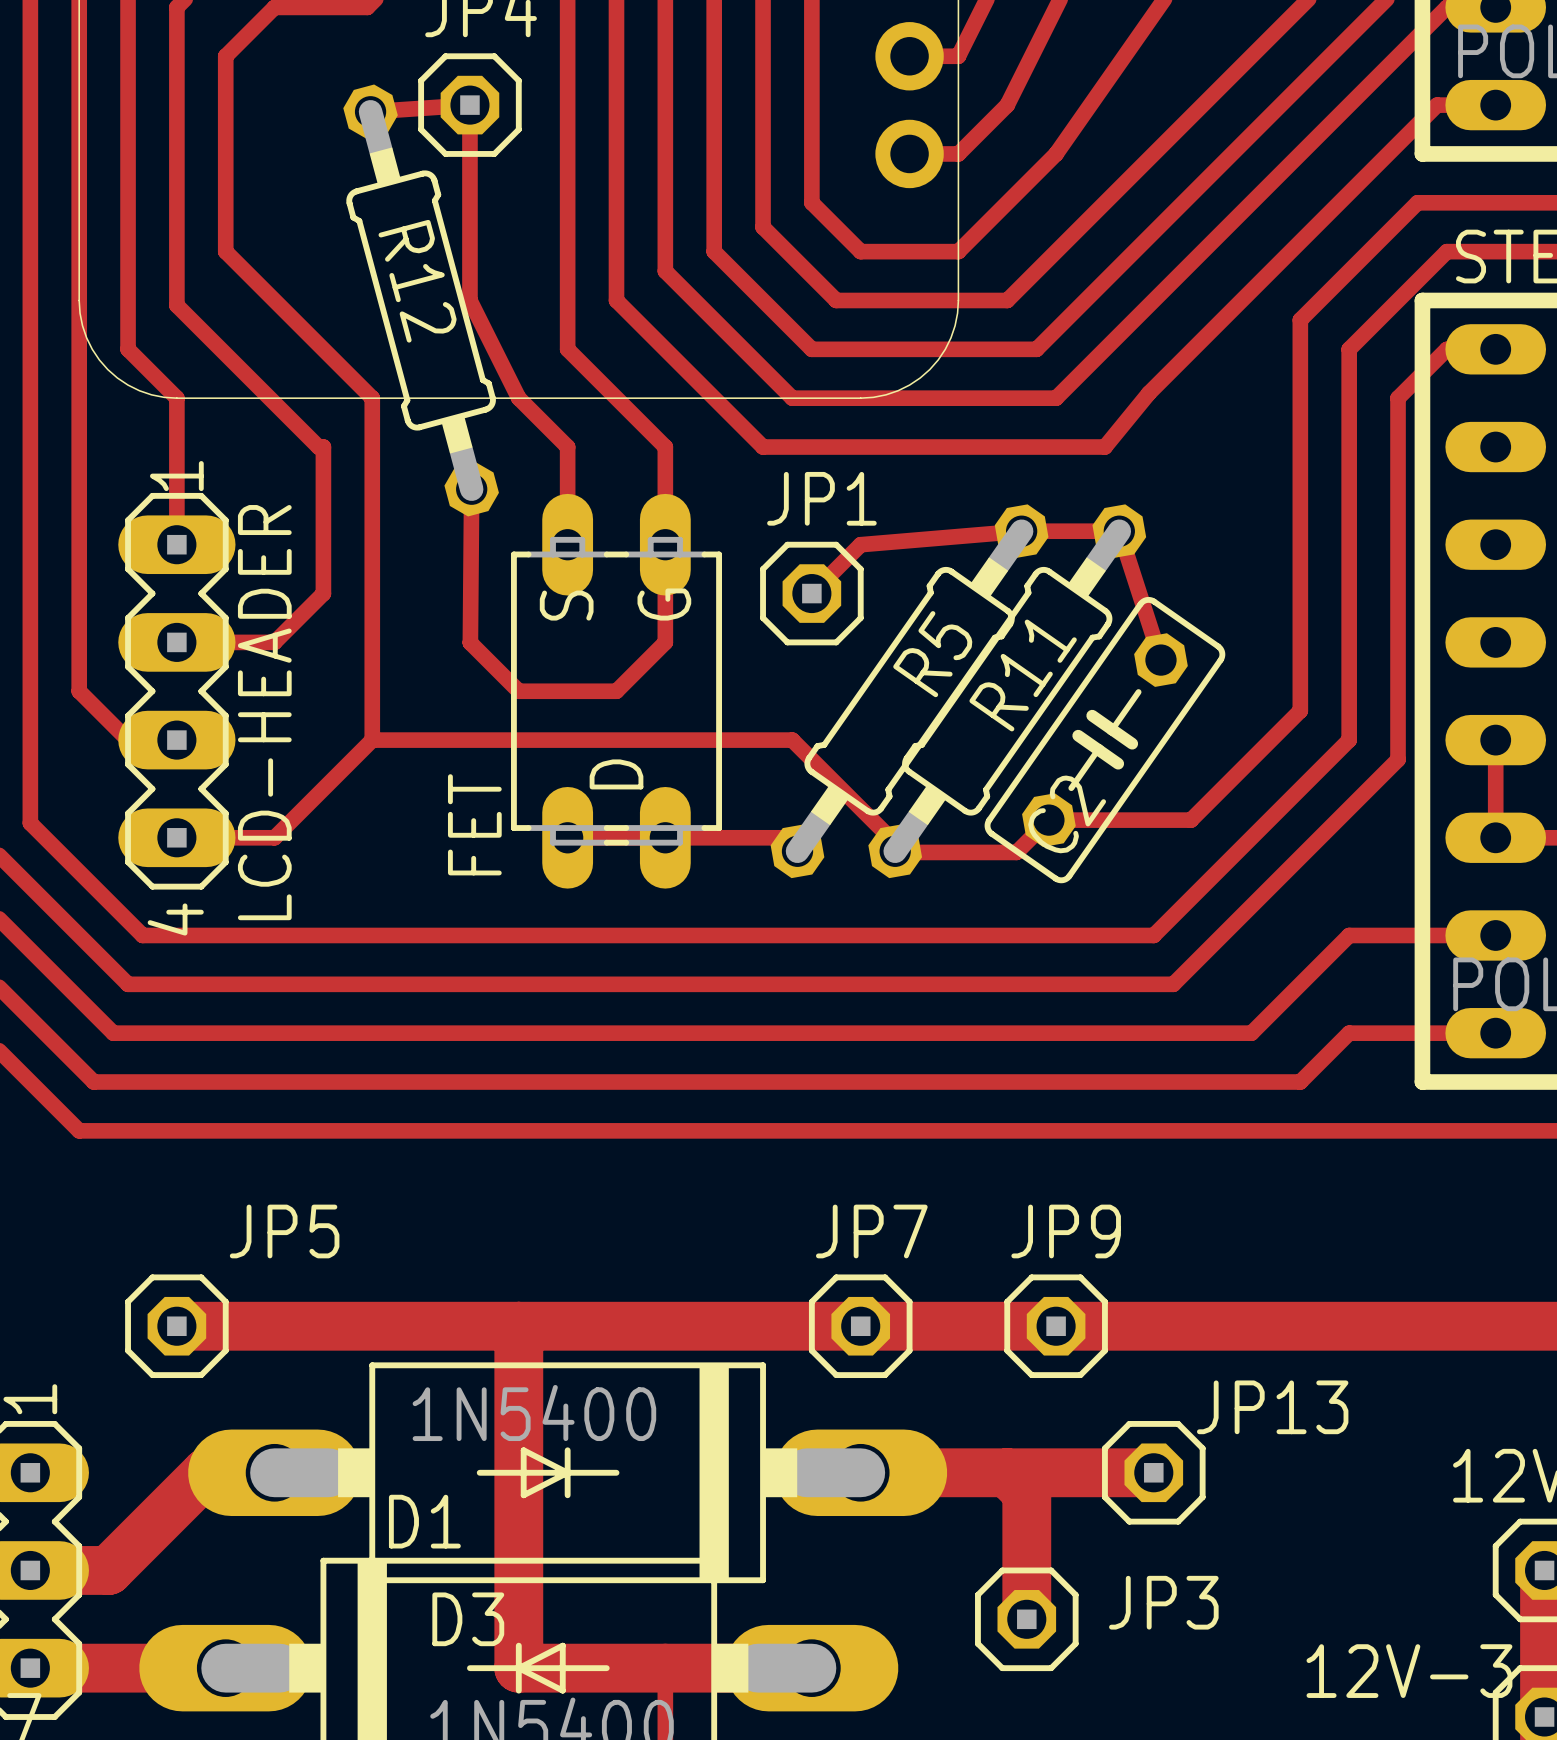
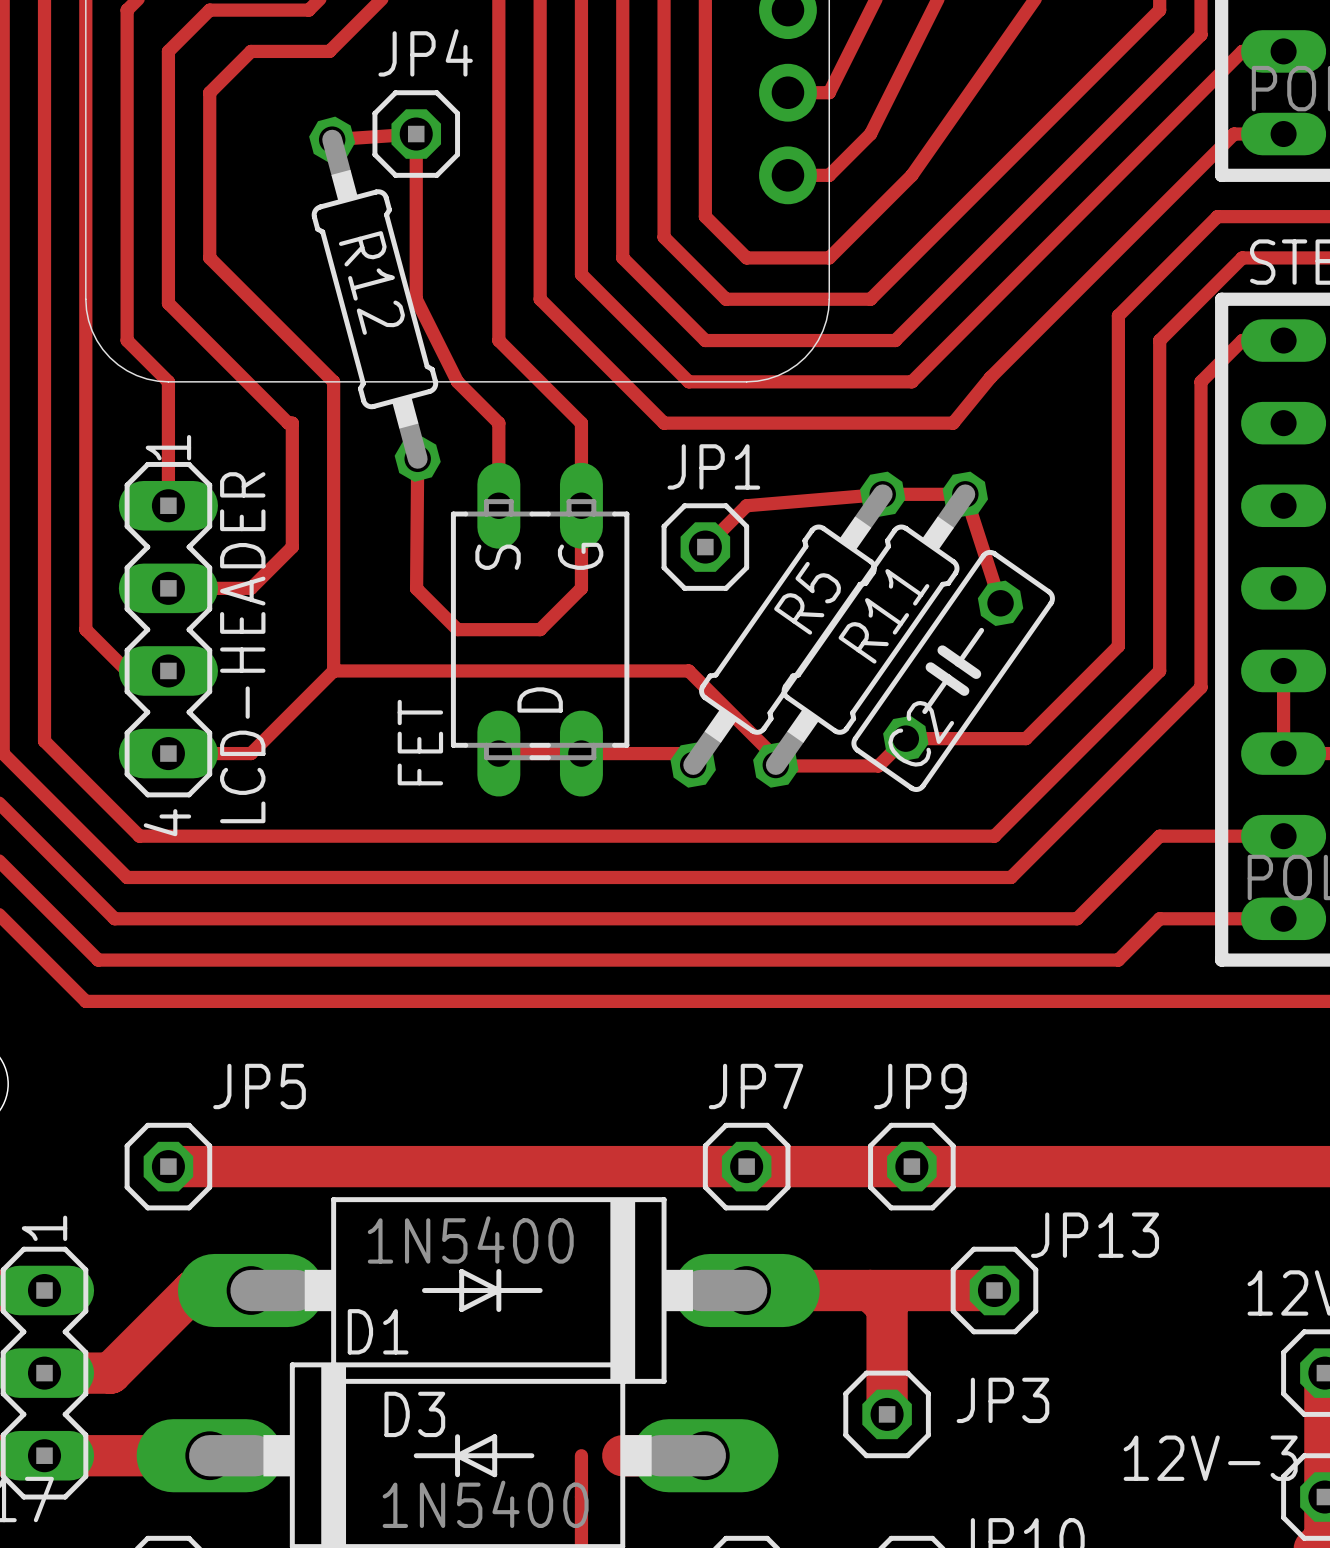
track: (518, 1326) (518, 1668) (714, 1668) -> none

